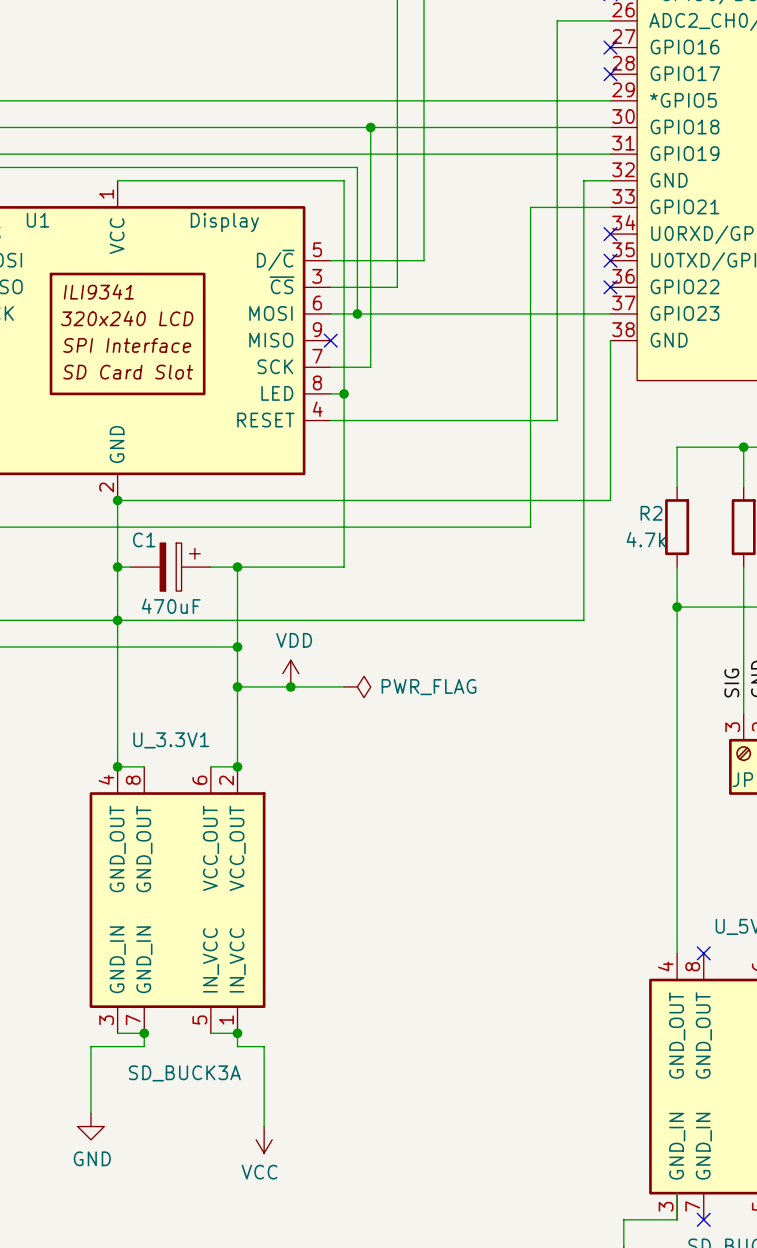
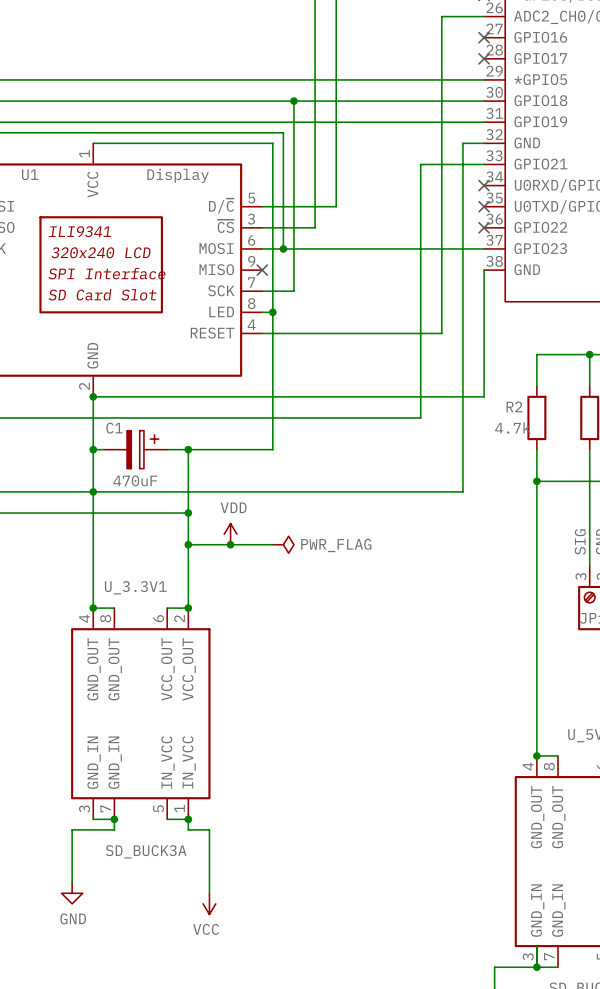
wire: none -> (536, 755) (558, 755)
junction: none -> (536, 755)
no-connect mark: (703, 953) -> none
wire: none -> (536, 967) (558, 967)
junction: none -> (536, 967)
no-connect mark: (703, 1219) -> none

